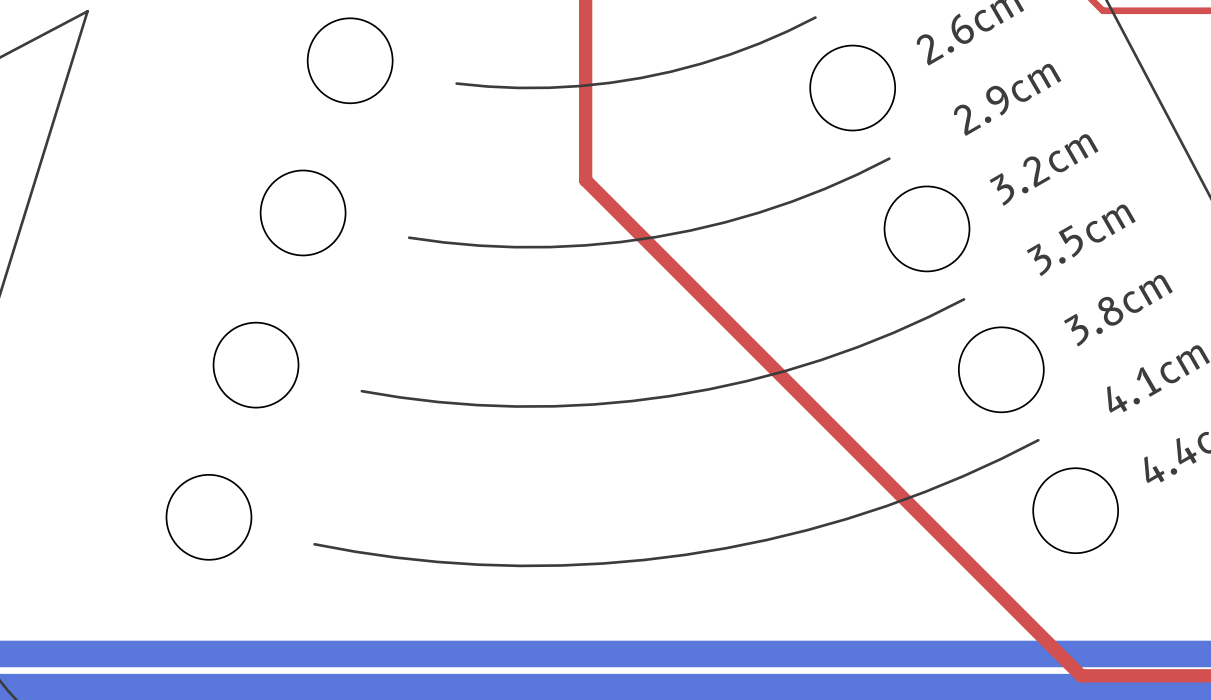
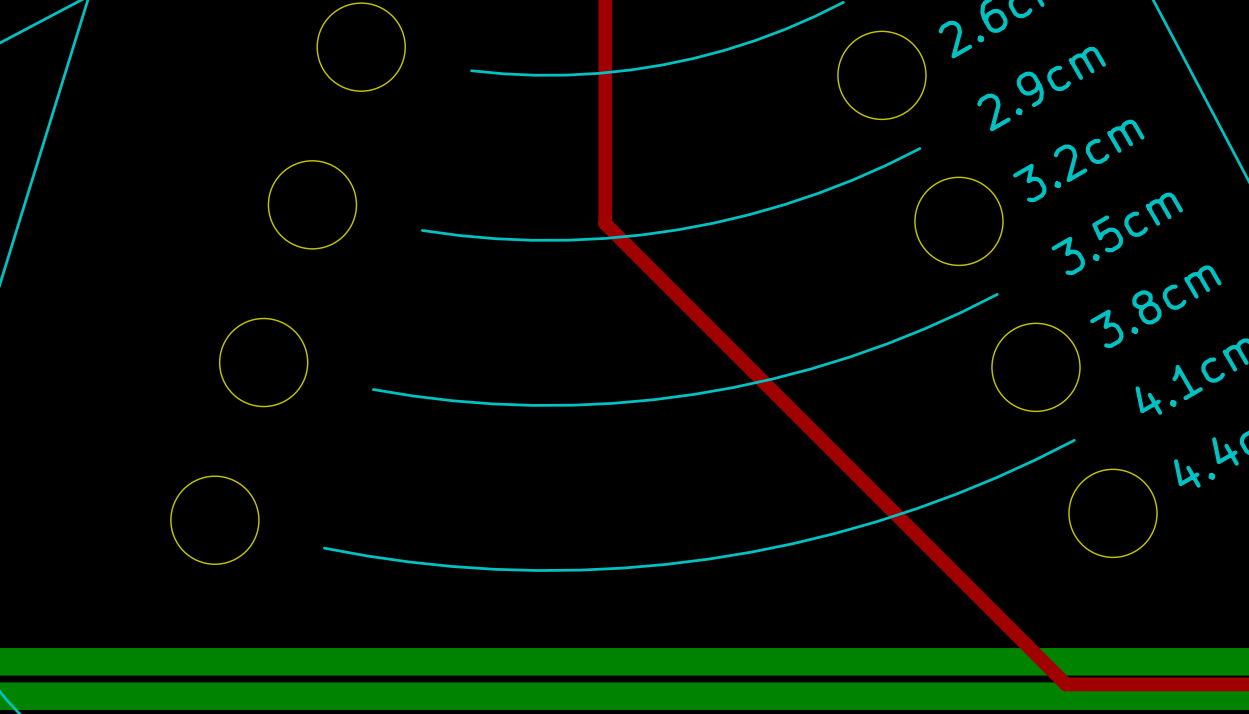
top track: (585, 180) (1081, 675) -> (605, 170) (605, 223) (1066, 684) (1118, 684)

